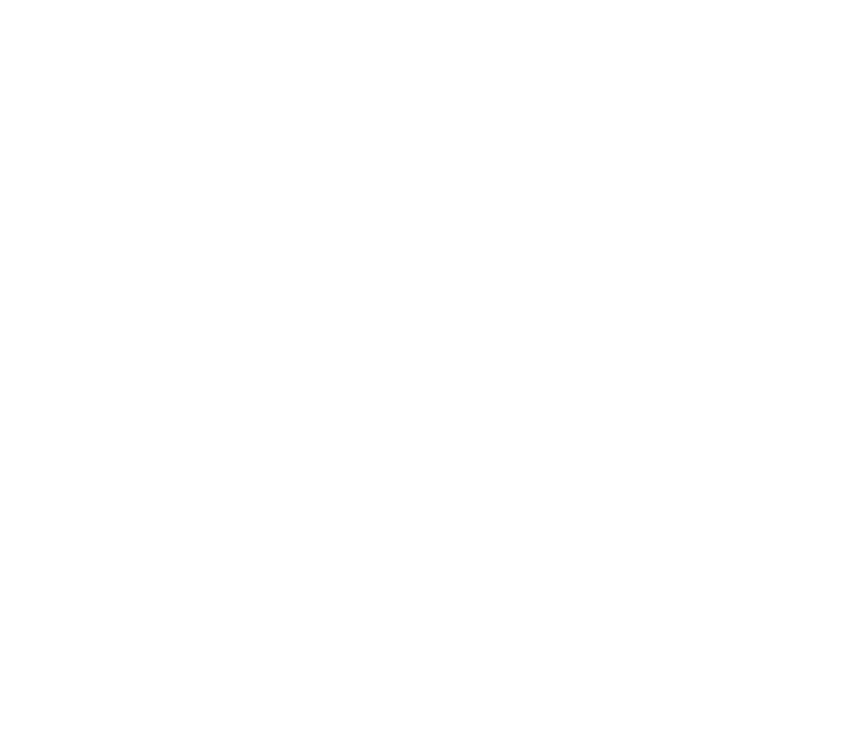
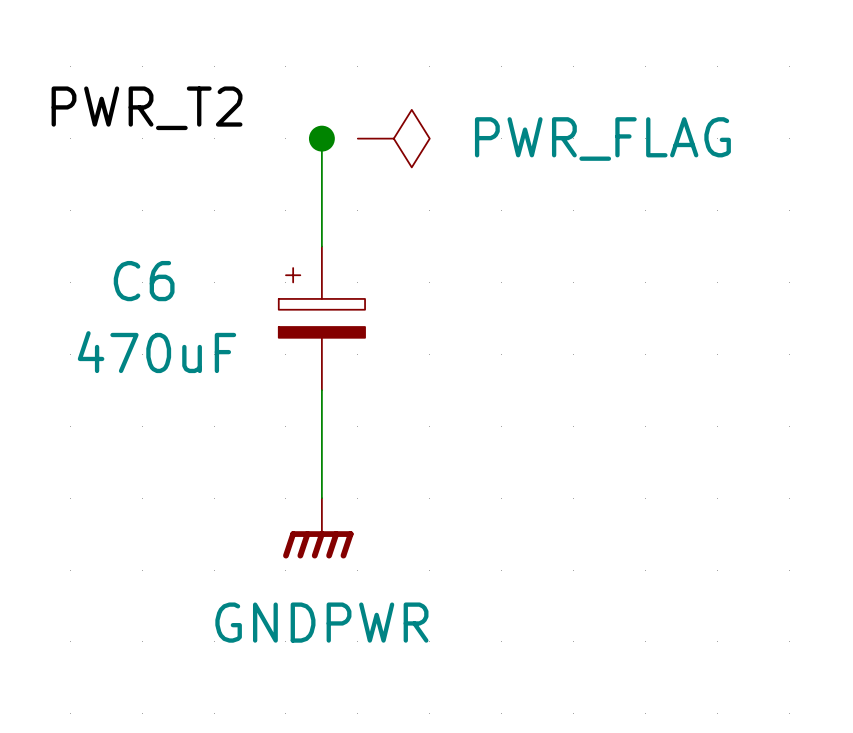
label: none -> PWR_T2 (147, 108)
wire: none -> (321, 138) (321, 246)
junction: none -> (321, 138)
power symbol: none -> PWR_FLAG (393, 138)
C6: none -> 470uF (321, 318)
wire: none -> (321, 390) (321, 498)
power symbol: none -> GNDPWR (318, 528)

